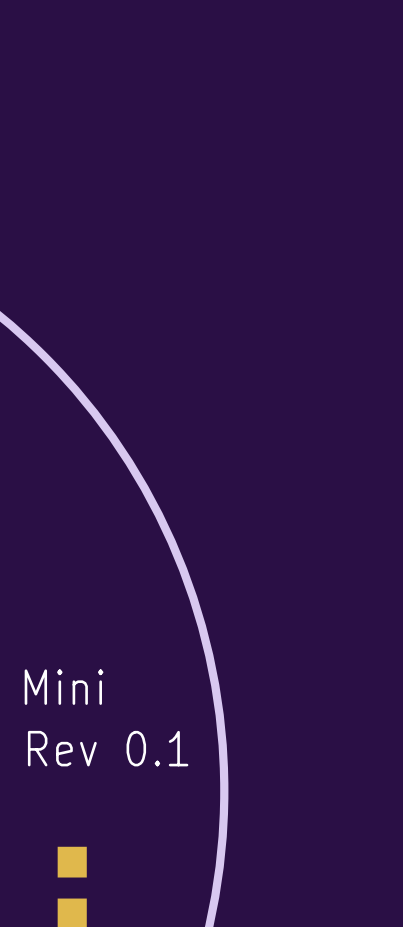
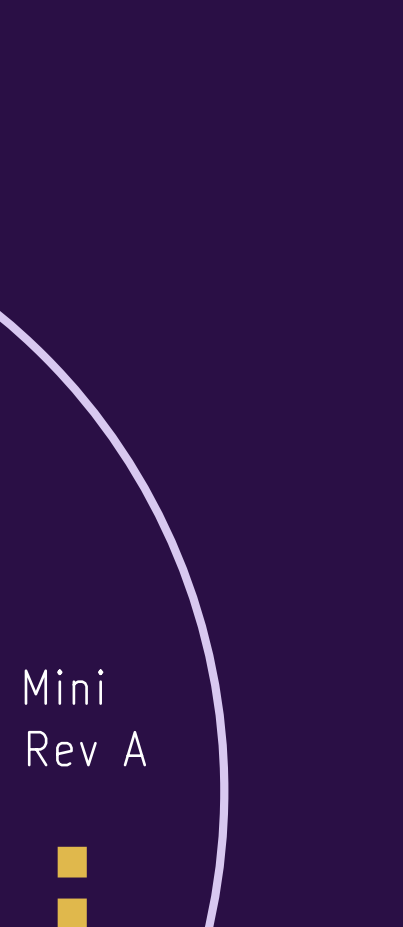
text: Rev 0.1 (108, 748) -> Rev A (86, 748)

